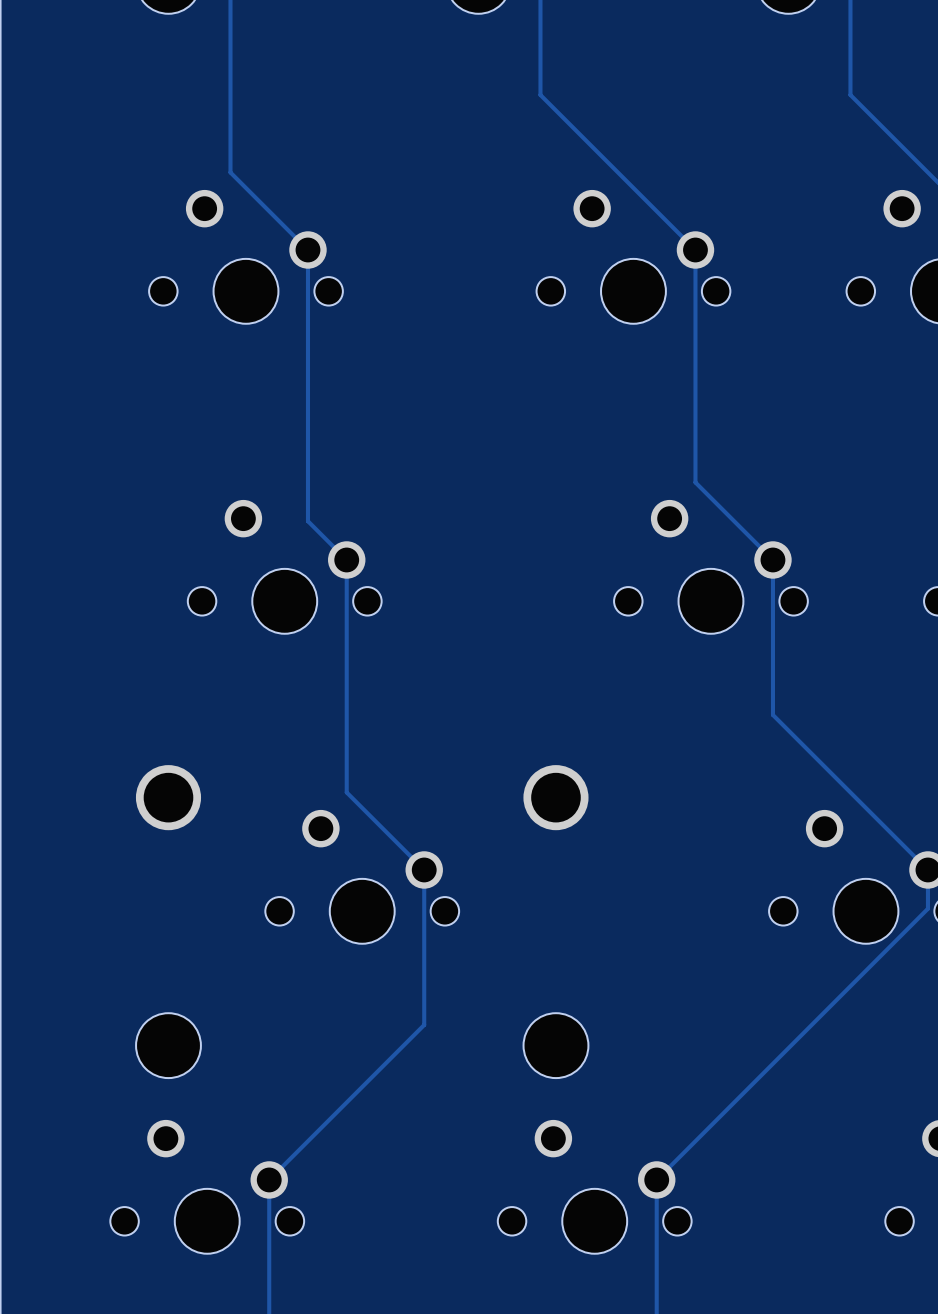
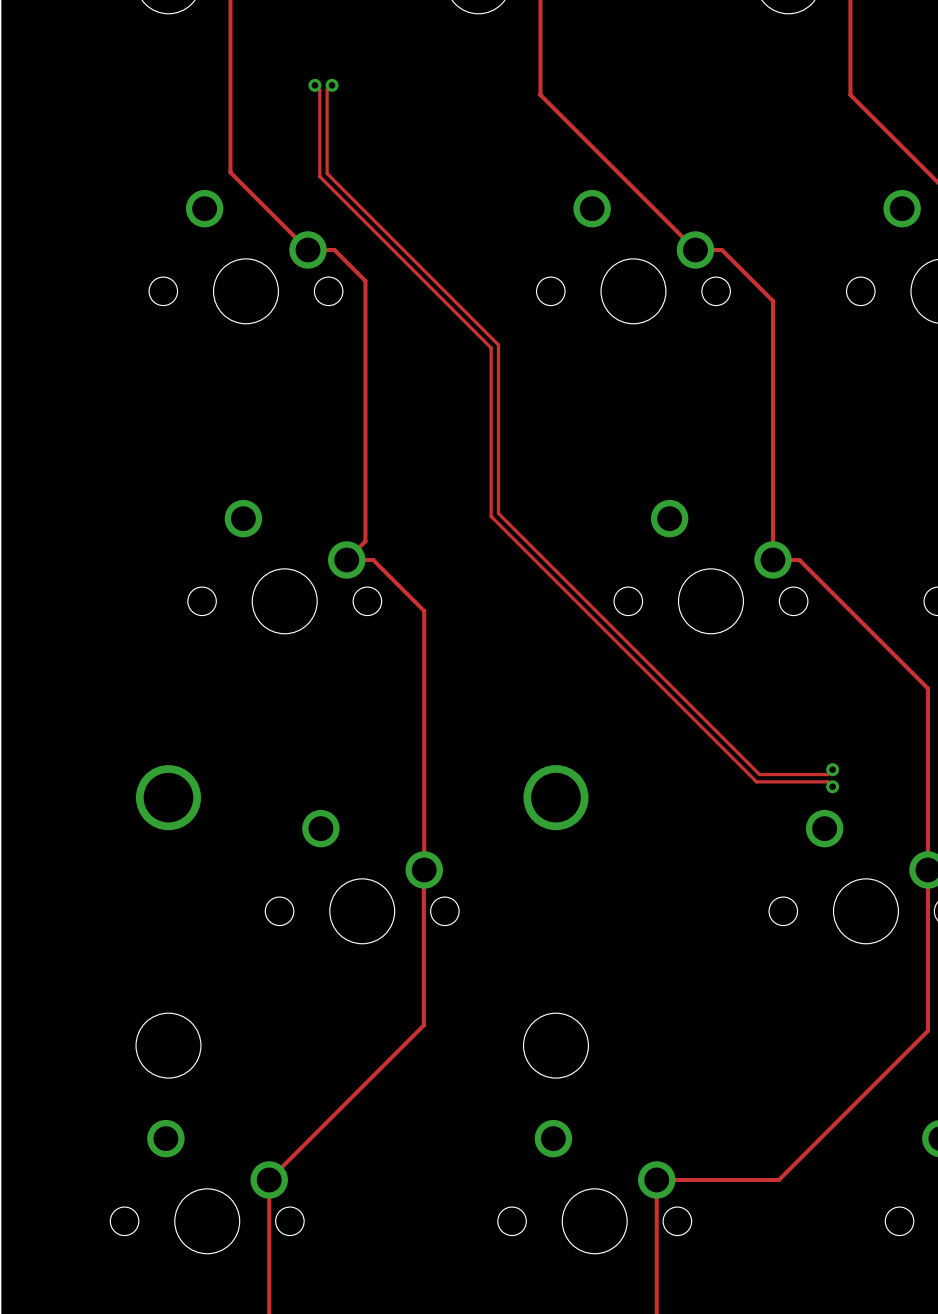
track: none -> (314, 85) (319, 90) (319, 176) (491, 347) (491, 516) (756, 781) (827, 781) (832, 786)
via: none -> (314, 85)
track: none -> (332, 85) (327, 90) (327, 173) (498, 344) (498, 513) (759, 774) (827, 774) (832, 769)
via: none -> (332, 85)
track: (307, 249) (307, 521) (346, 559) (346, 792) (424, 869) (423, 1025) -> (307, 249) (334, 249) (365, 280) (365, 541) (346, 559) (373, 559) (424, 611) (423, 1025)
track: (695, 249) (695, 482) (772, 559) (772, 714) (927, 869) -> (695, 249) (721, 249) (772, 301) (772, 559) (799, 559) (927, 688) (927, 869)
via: none -> (832, 769)
via: none -> (832, 786)
track: (927, 908) (656, 1179) -> (927, 908) (927, 1030) (778, 1179) (656, 1179)

